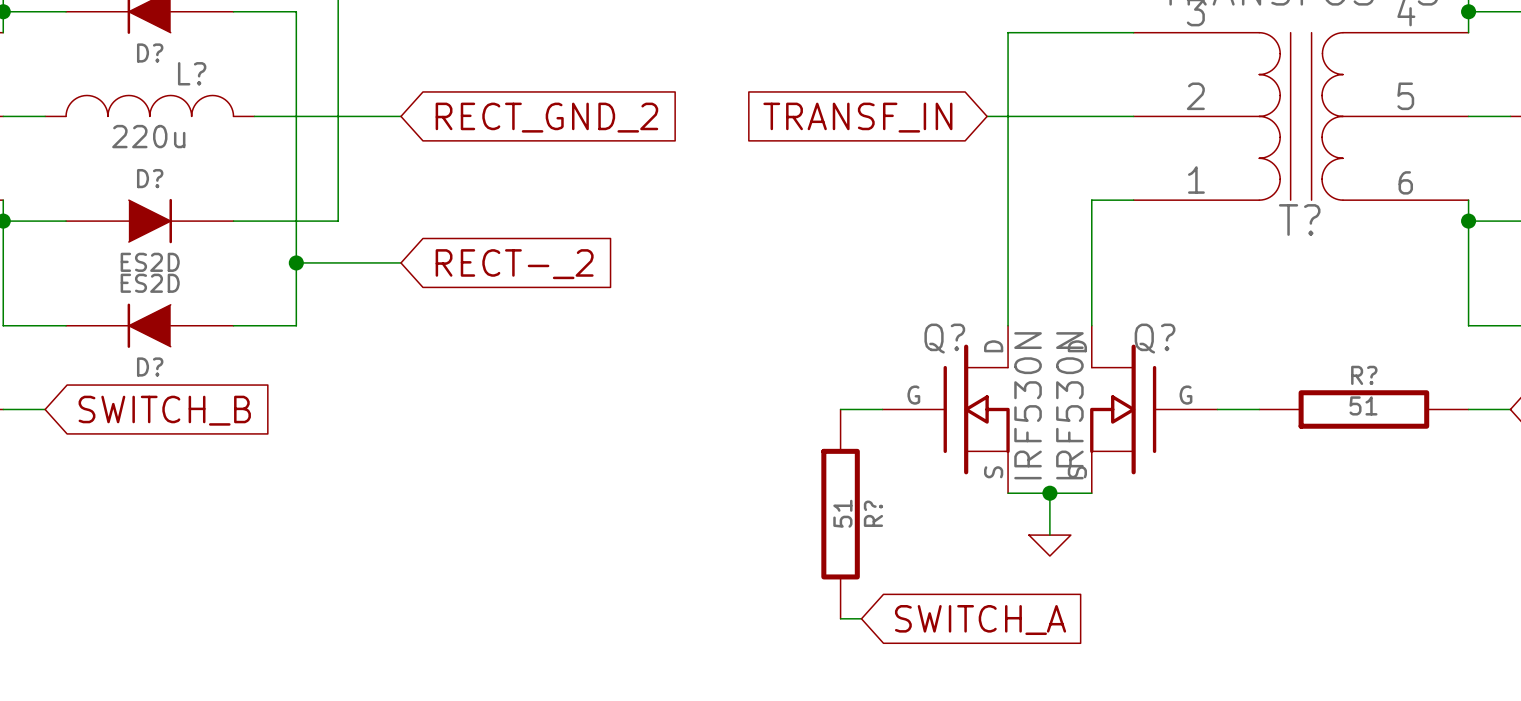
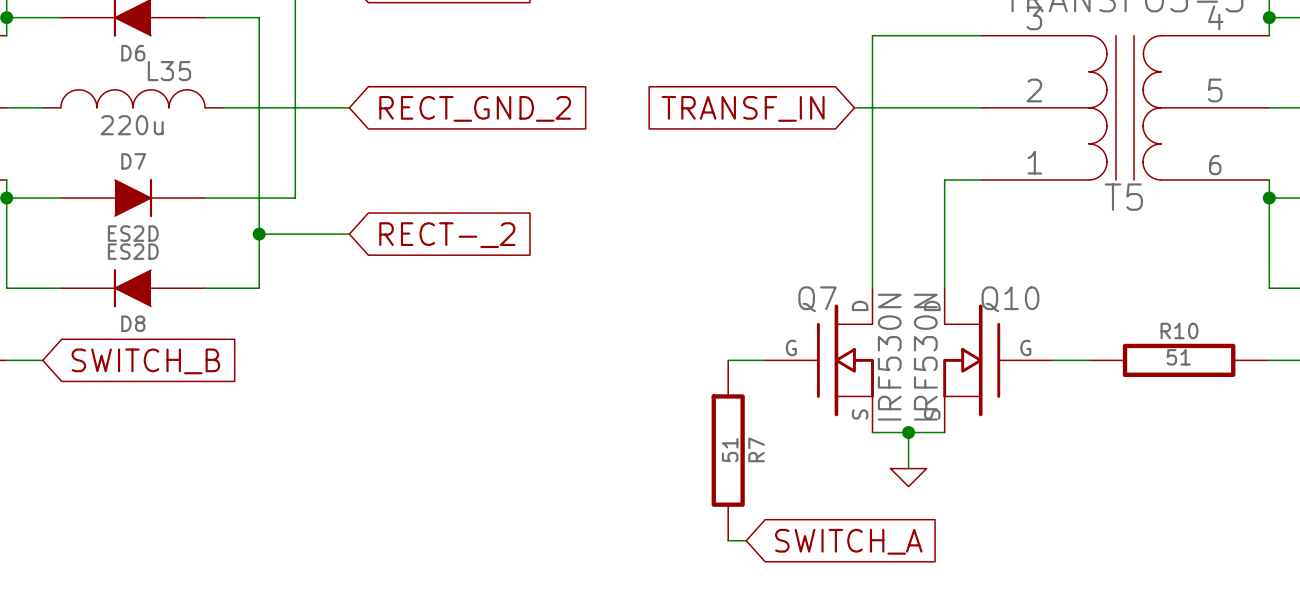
D? name: D? (150, 53) -> D6 (133, 53)
L? name: L? (192, 73) -> L35 (169, 71)
D? name: D? (150, 178) -> D7 (133, 161)
T? name: T? (1299, 219) -> T5 (1123, 197)
Q? name: Q? (944, 338) -> Q7 (817, 299)
Q? name: Q? (1155, 338) -> Q10 (1010, 299)
D? name: D? (150, 366) -> D8 (133, 323)
R? name: R? (1364, 375) -> R10 (1179, 330)
R? name: R? (873, 513) -> R7 (756, 449)

